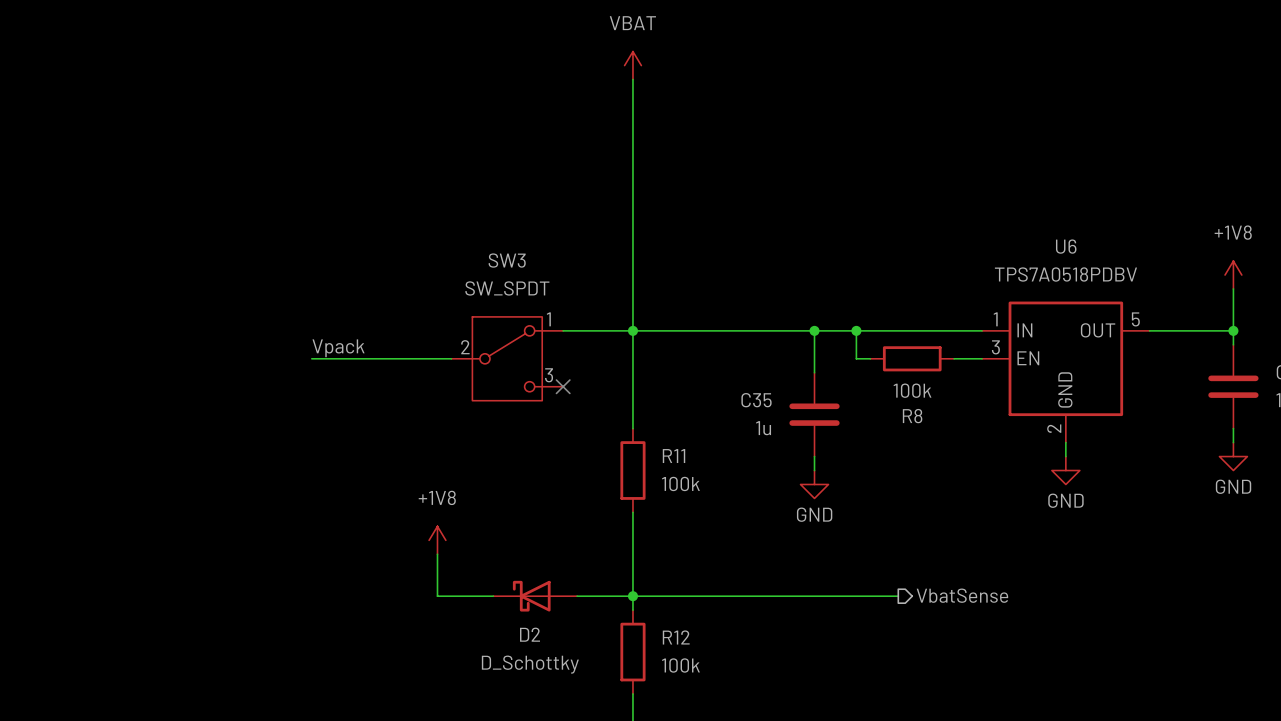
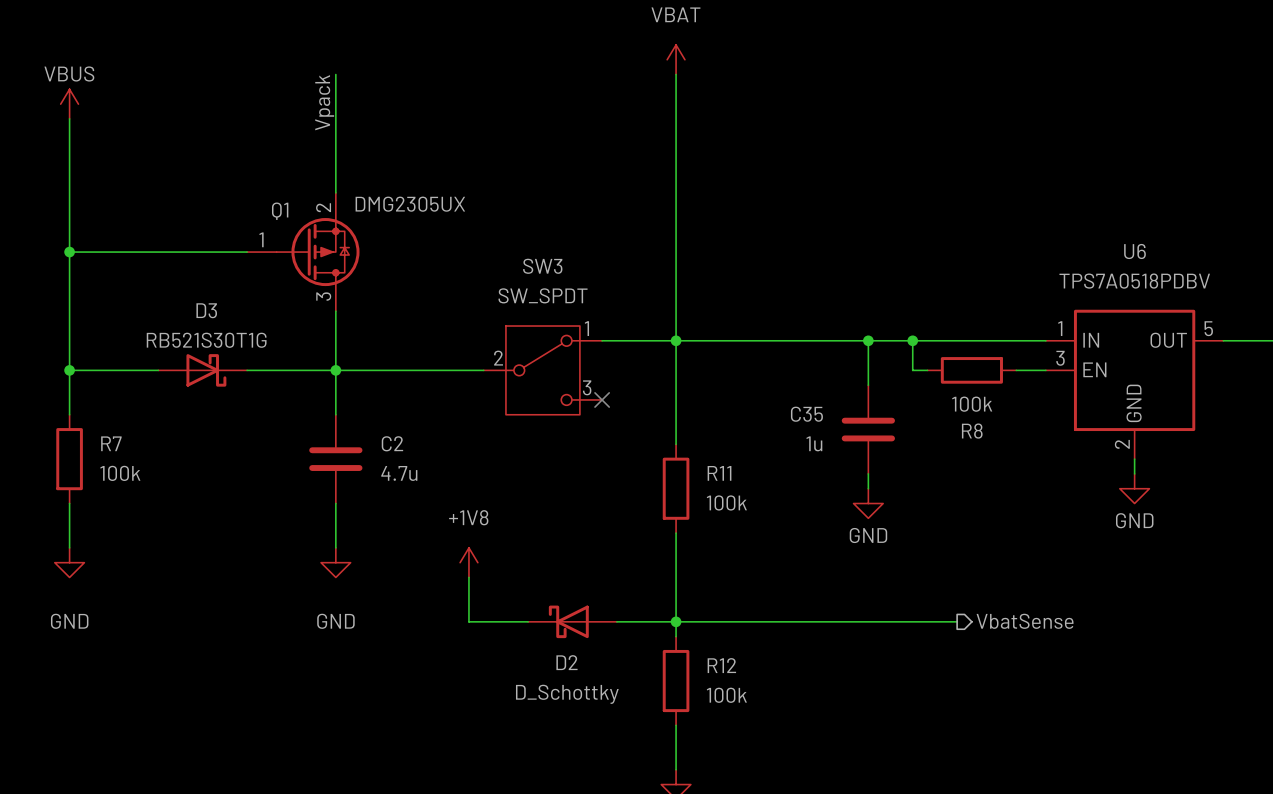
wire: none -> (335, 74) (335, 192)
label: none -> Vpack (324, 102)
power symbol: none -> VBUS (69, 104)
wire: none -> (69, 118) (69, 414)
wire: none -> (69, 252) (247, 252)
junction: none -> (69, 252)
Q1: none -> DMG2305UX (303, 252)
wire: none -> (335, 311) (335, 414)
label: Vpack (338, 348) -> none
wire: none -> (69, 370) (158, 370)
junction: none -> (69, 370)
D3: none -> RB521S30T1G (202, 370)
wire: none -> (247, 370) (335, 370)
junction: none -> (335, 370)
R7: none -> 100k (69, 459)
C2: none -> 4.7u (335, 459)
wire: none -> (69, 503) (69, 547)
wire: none -> (335, 503) (335, 547)
power symbol: none -> GND (69, 562)
power symbol: none -> GND (335, 562)

